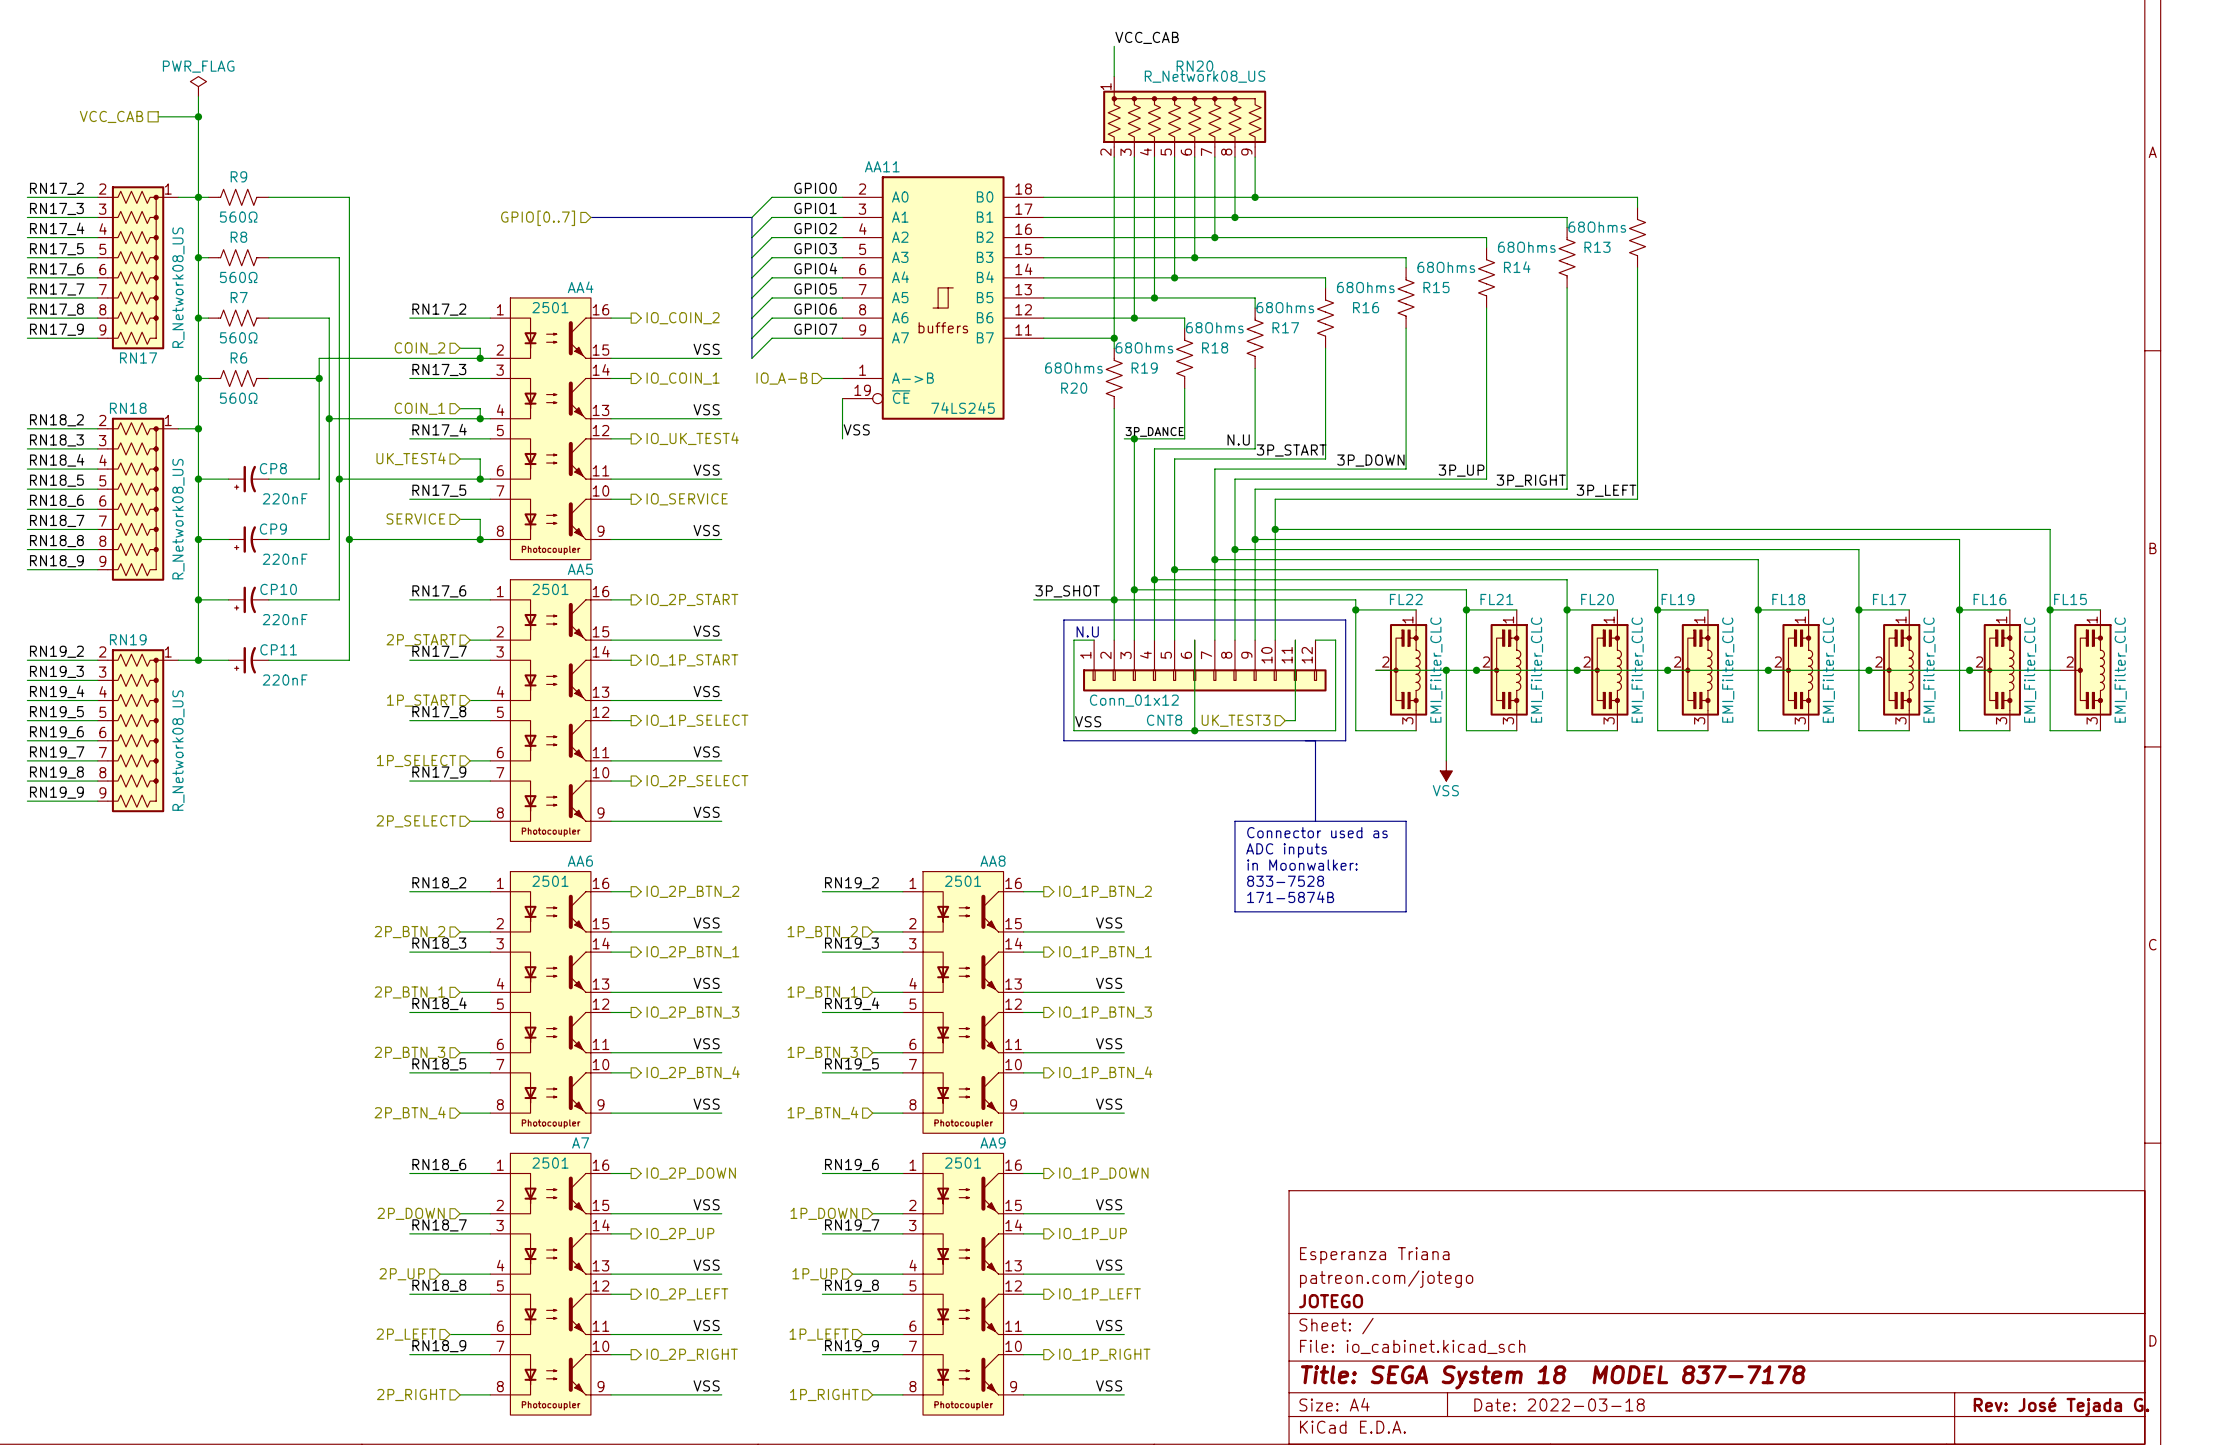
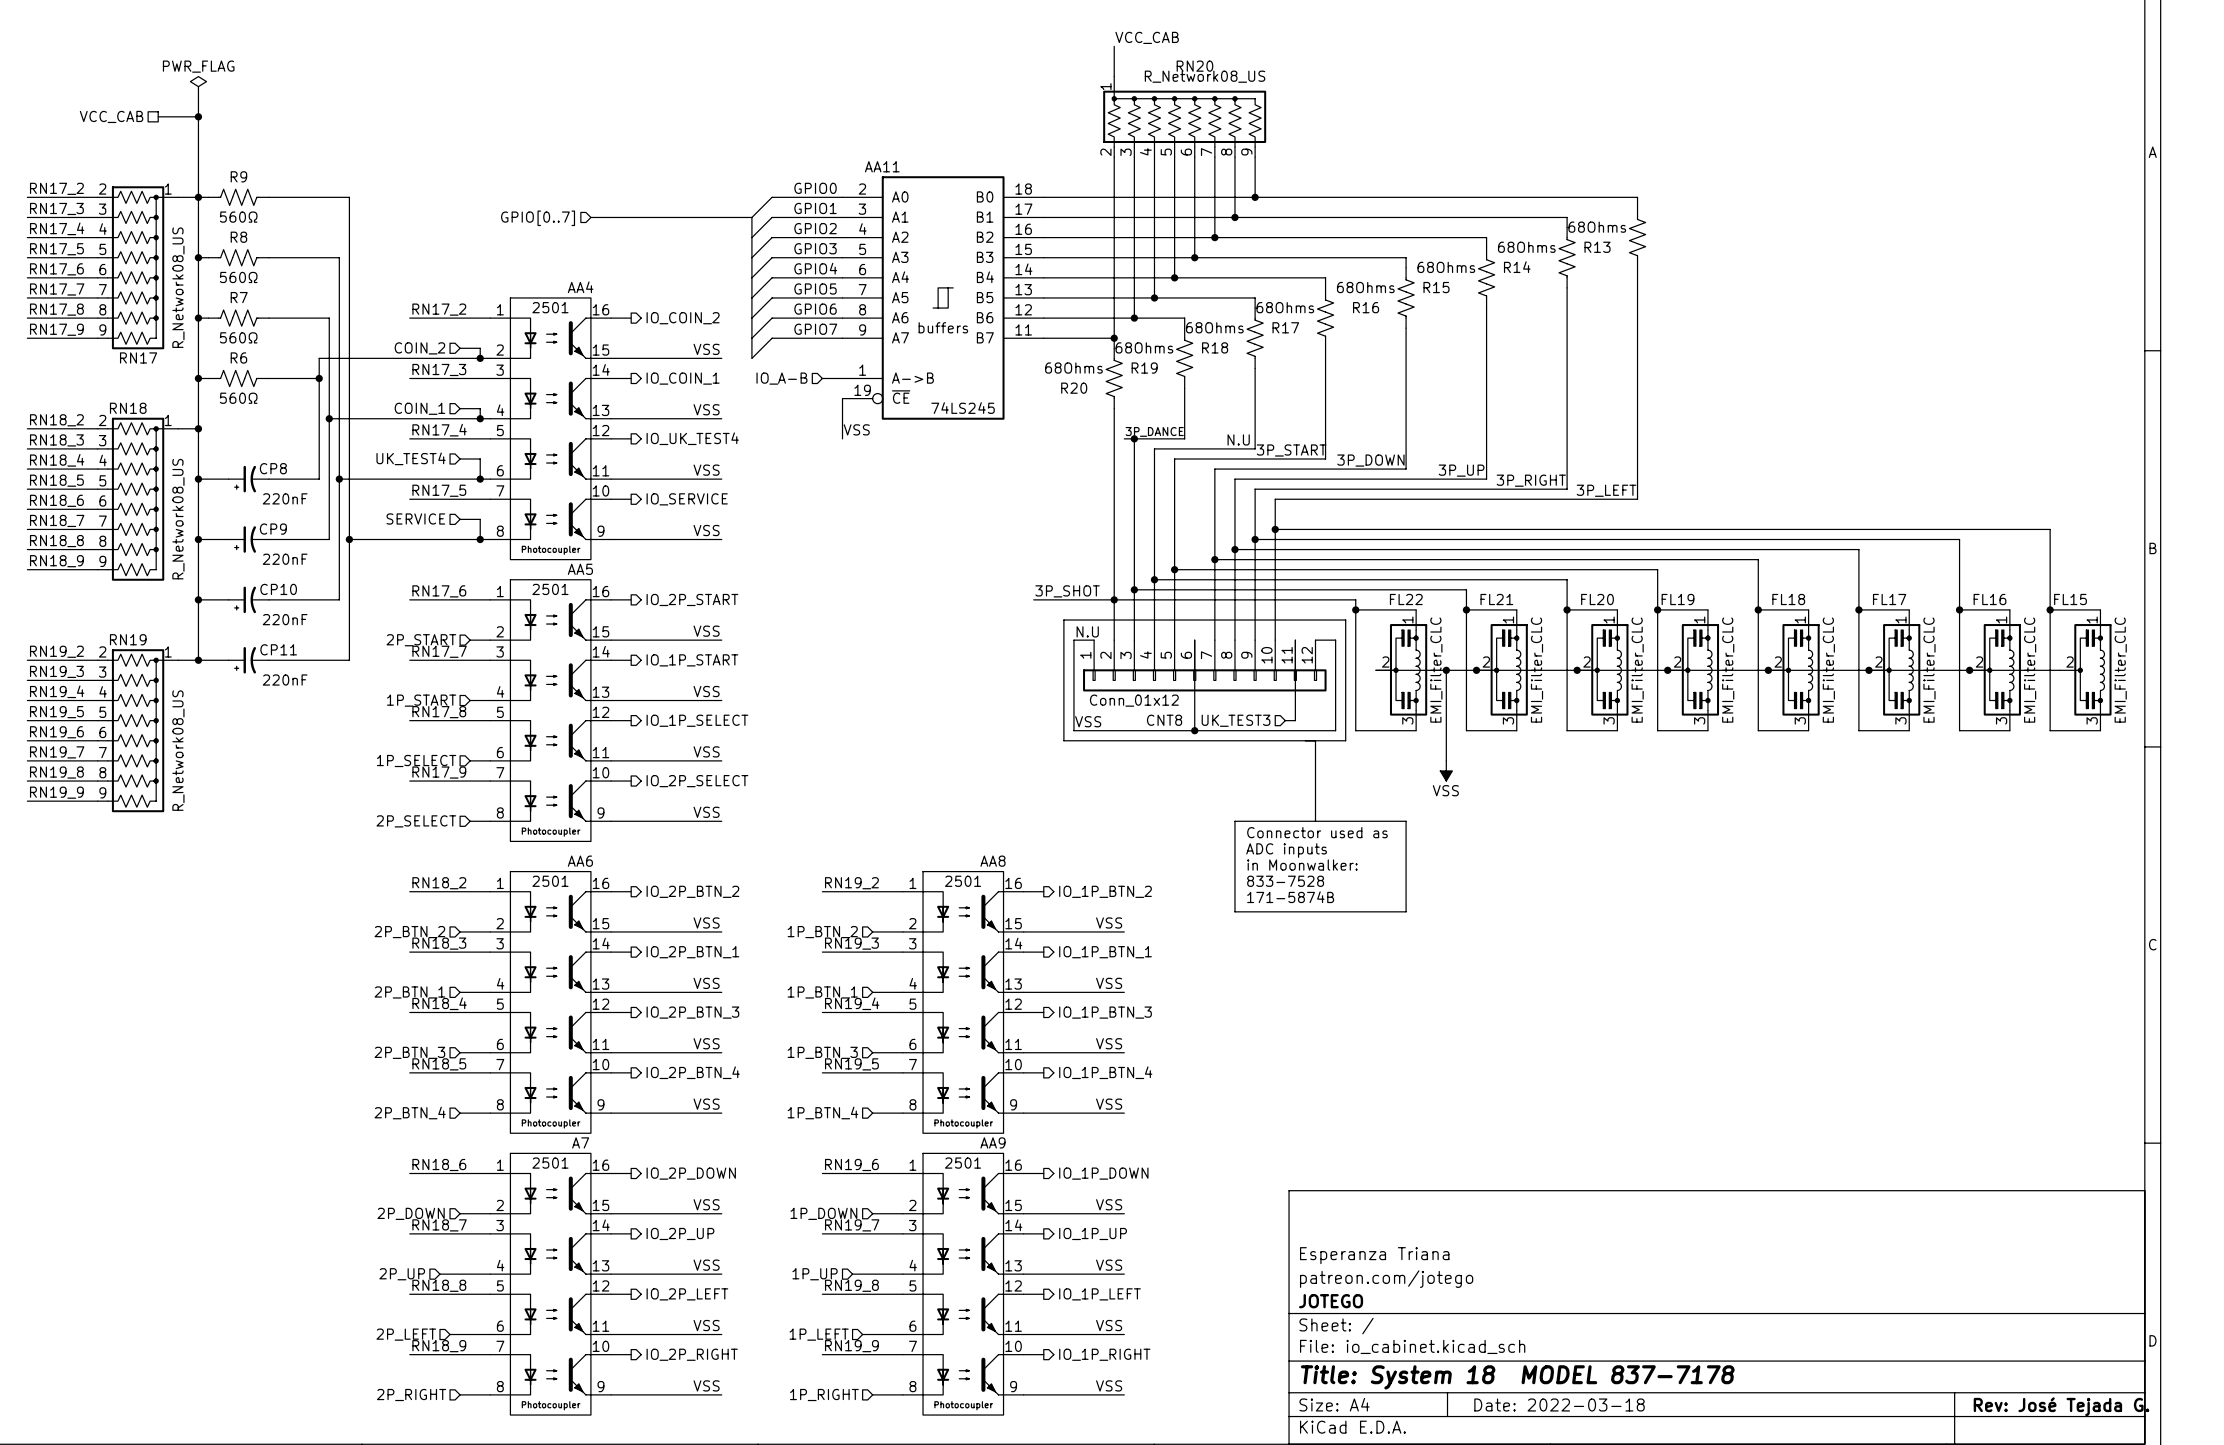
title block: Title: SEGA System 18 MODEL 837-7178 (1553, 1377) -> Title: System 18 MODEL 837-7178 (1517, 1377)

